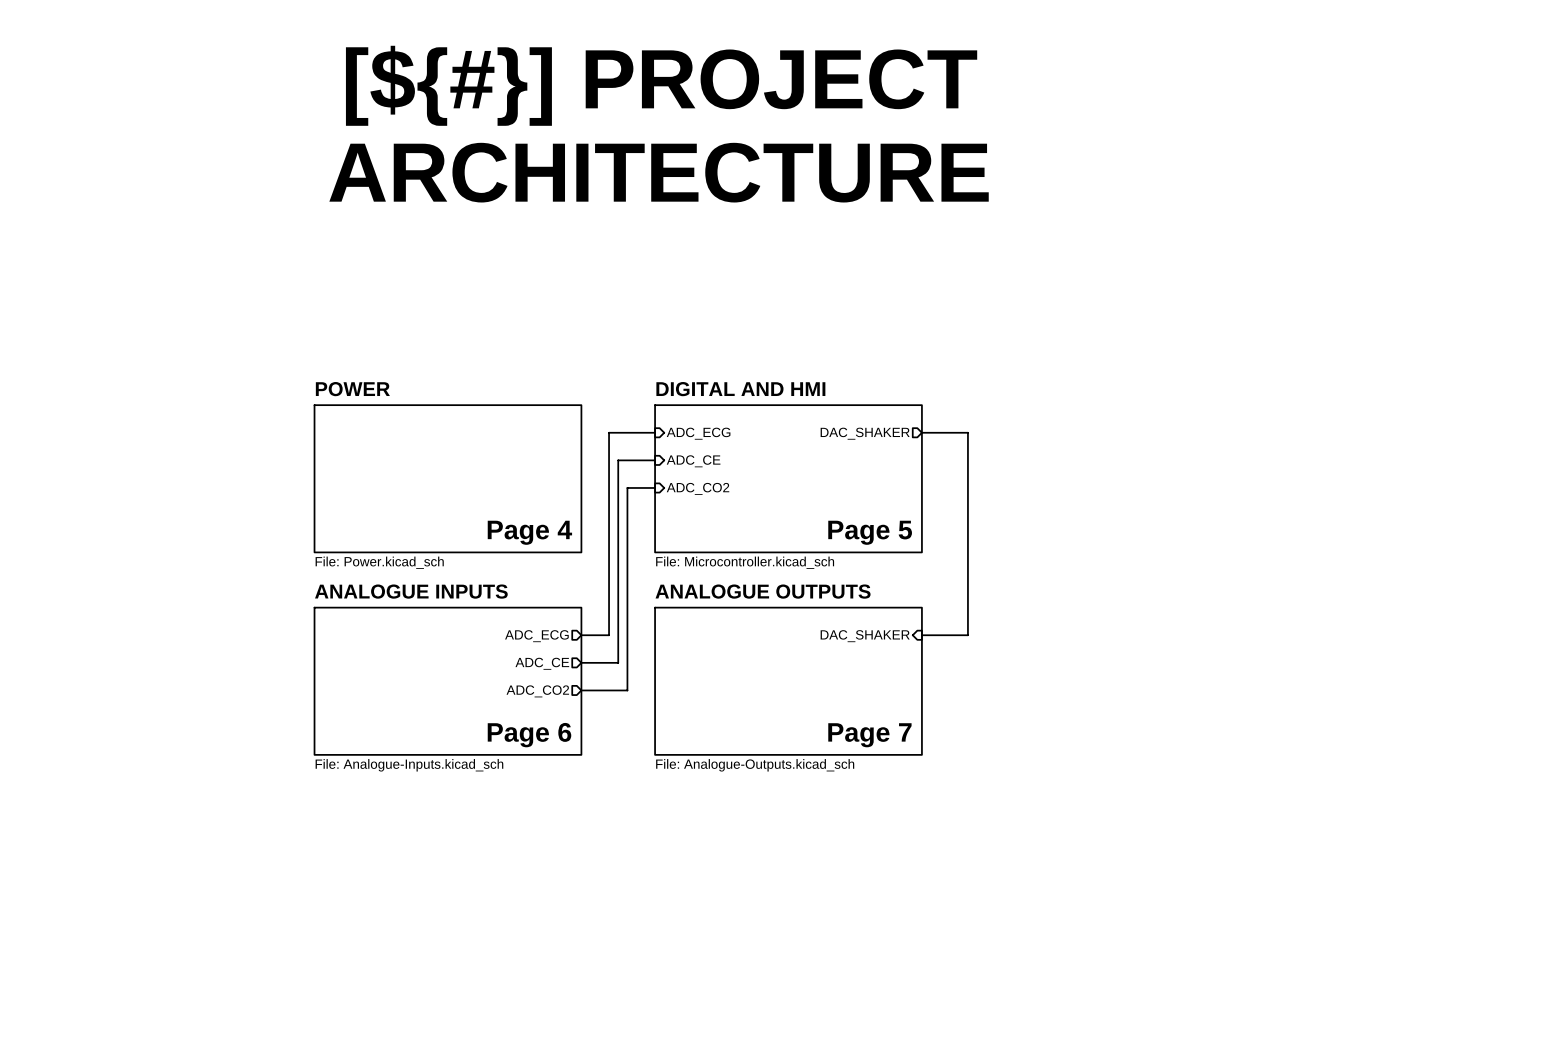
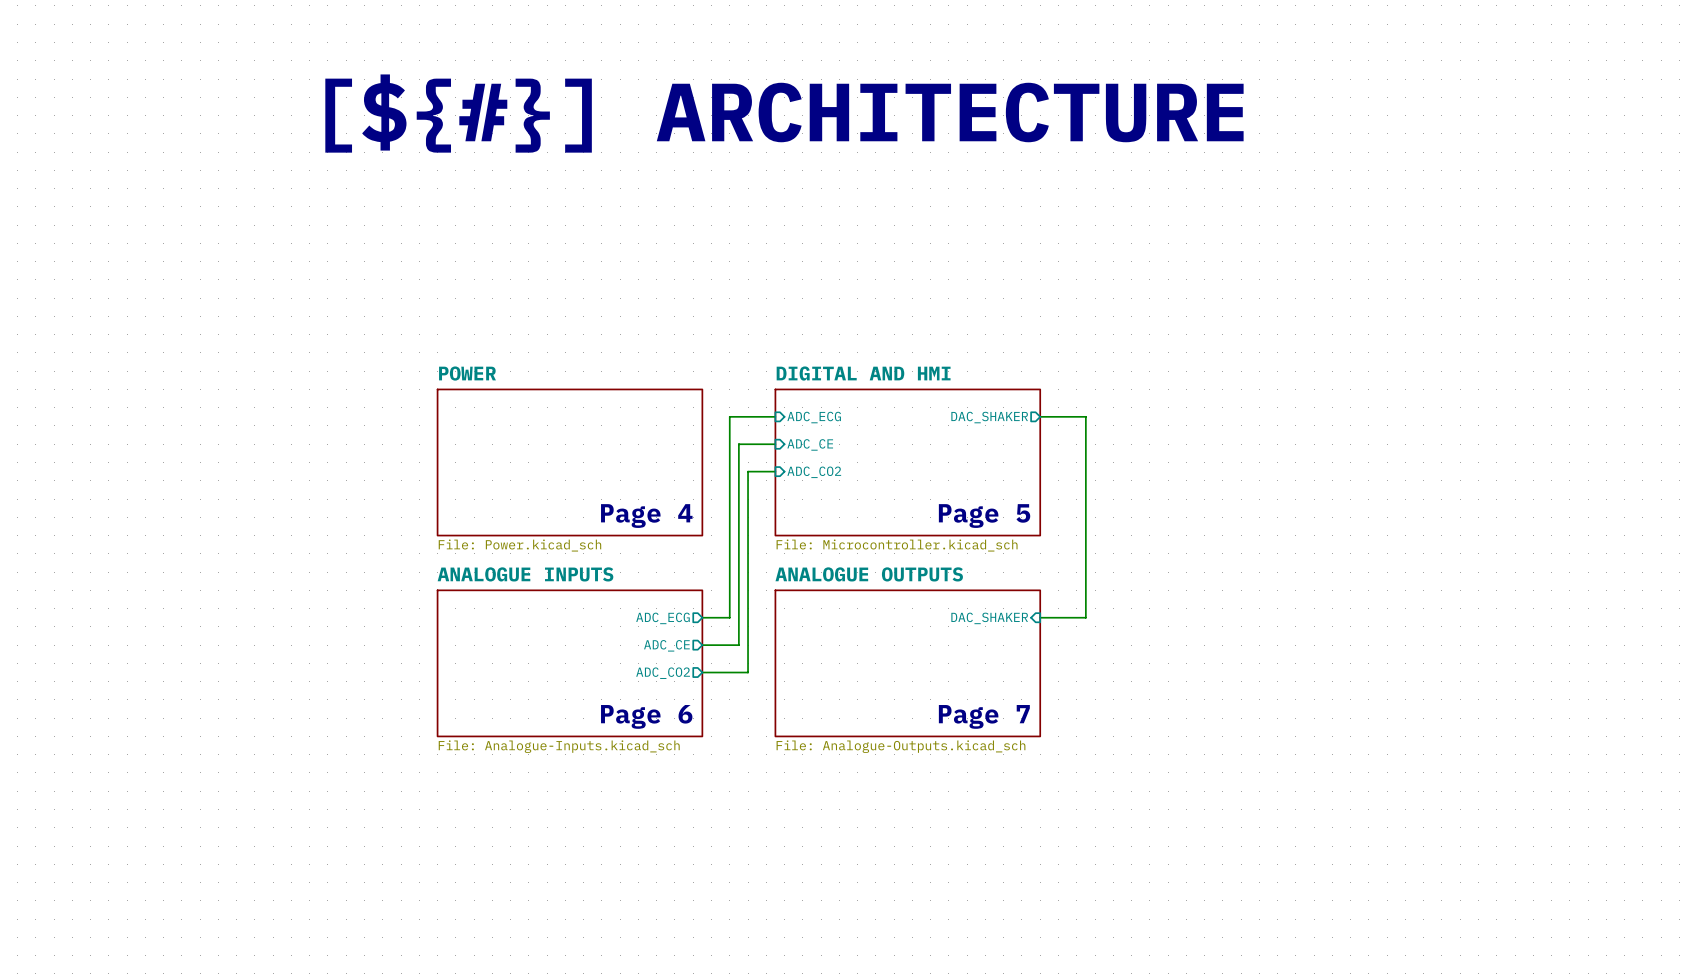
text: [${#}] PROJECT (661, 85) -> none
text: none -> [${#}] ARCHITECTURE (784, 113)
text: ARCHITECTURE (659, 172) -> none

